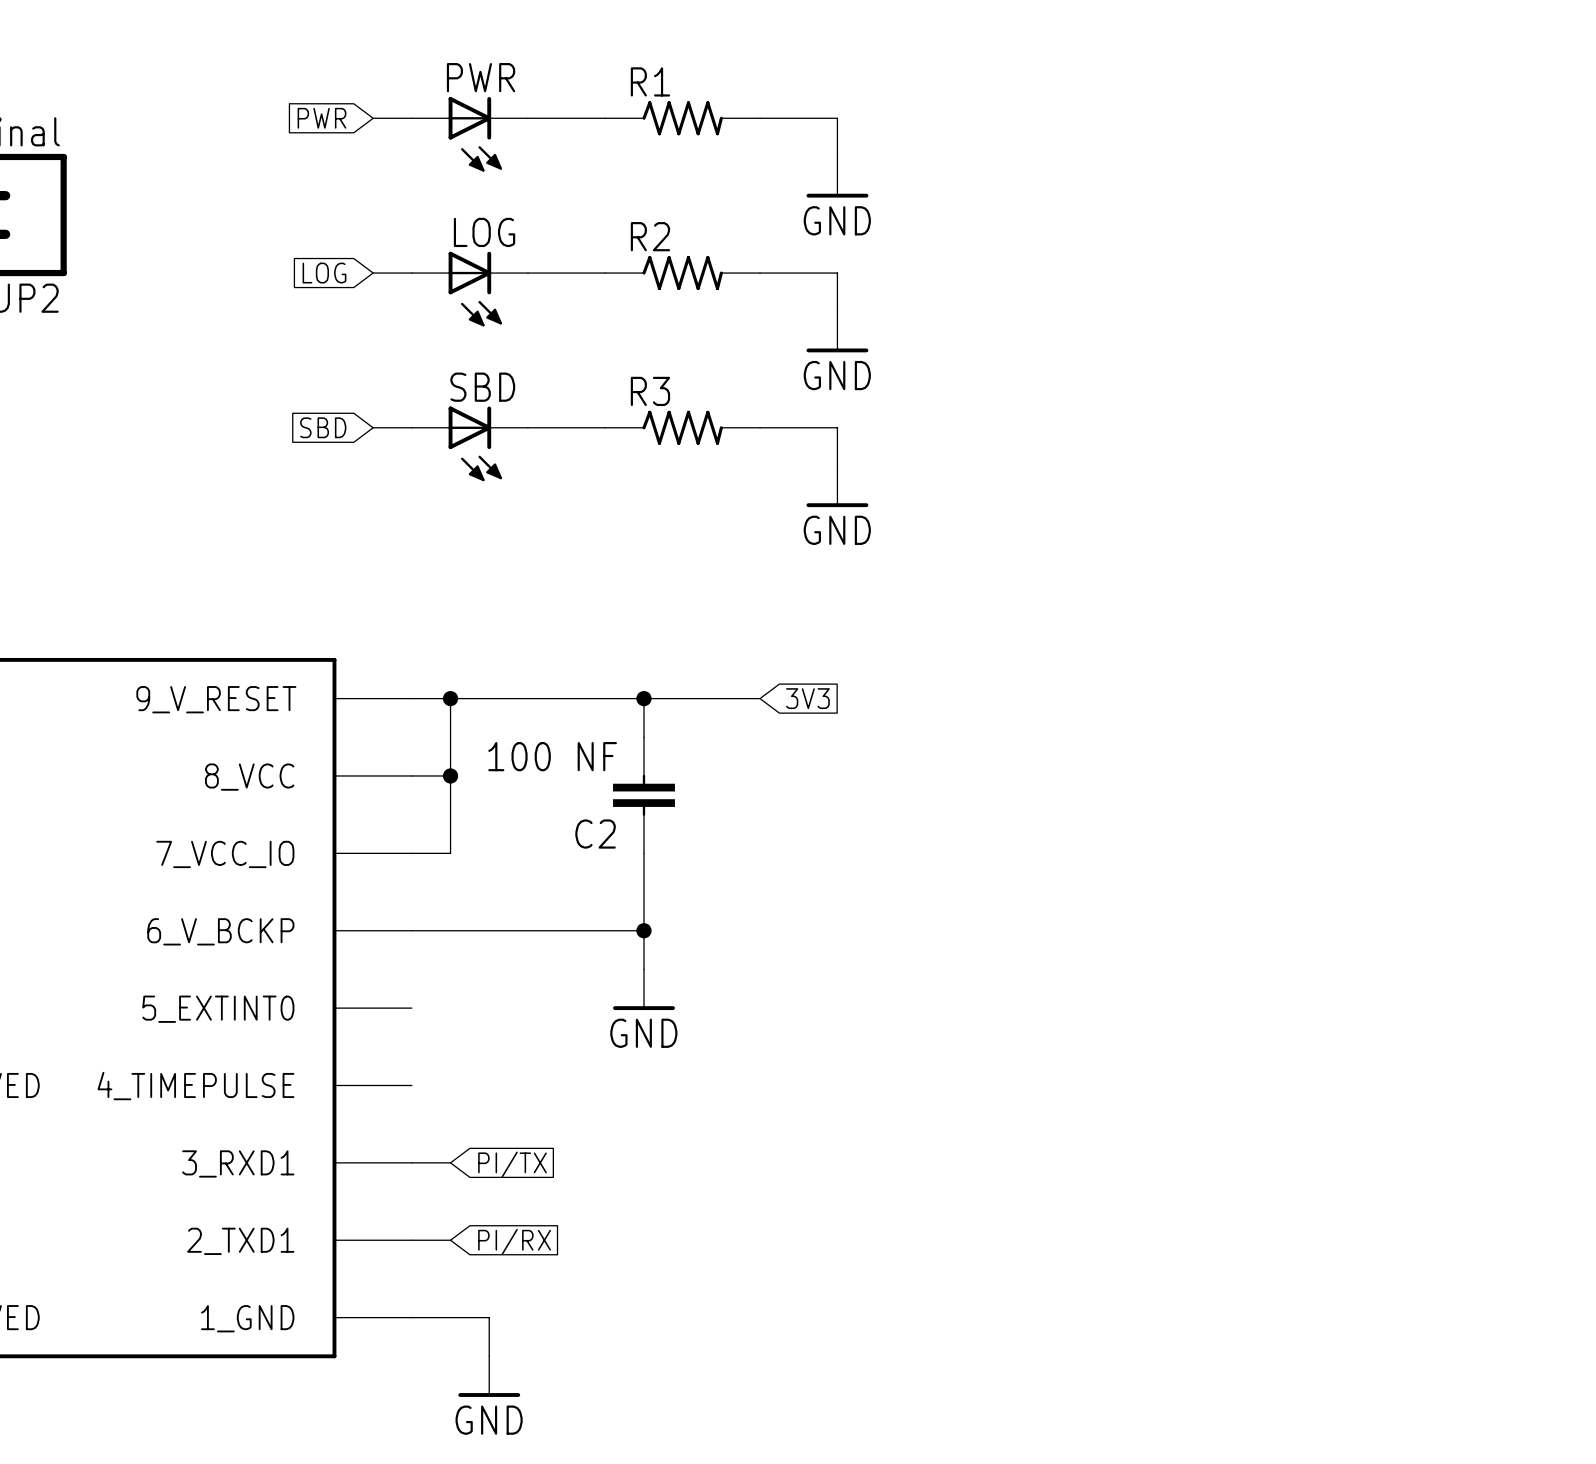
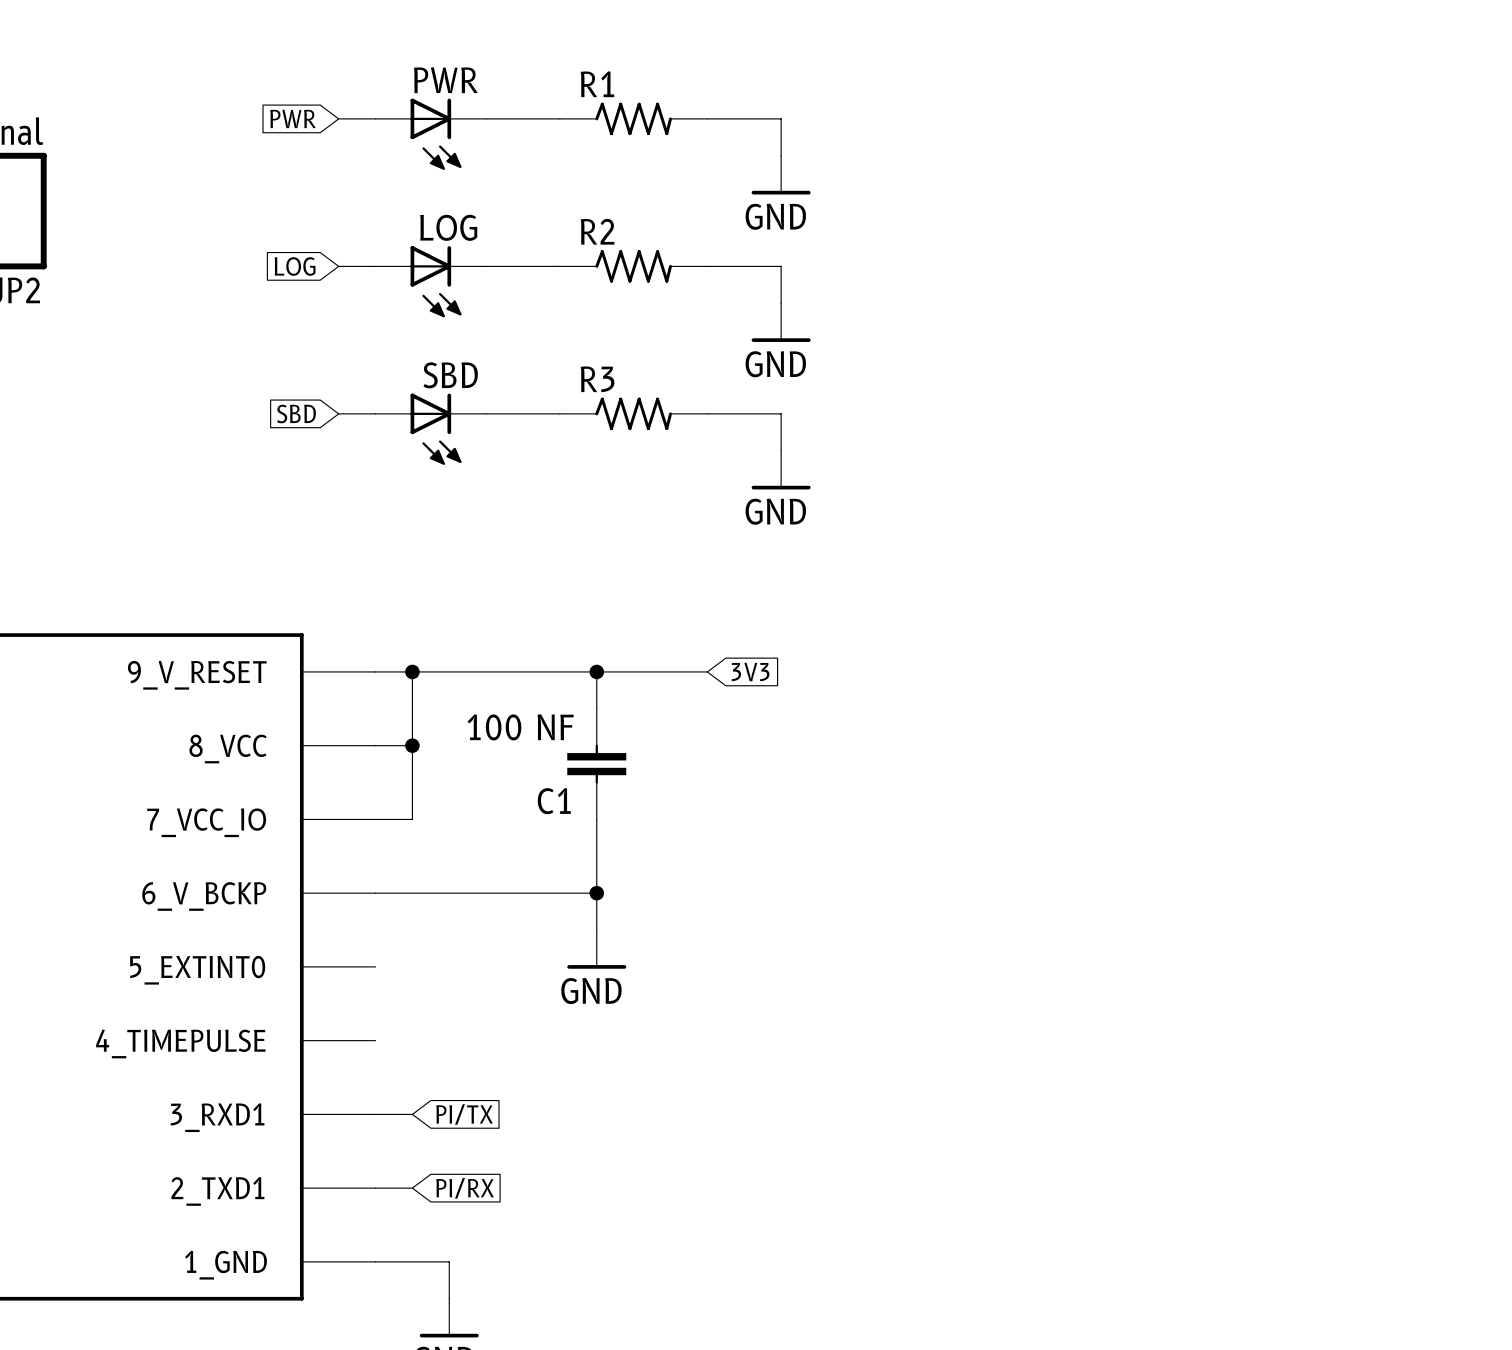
C2 name: C2 (595, 834) -> C1 (554, 801)

